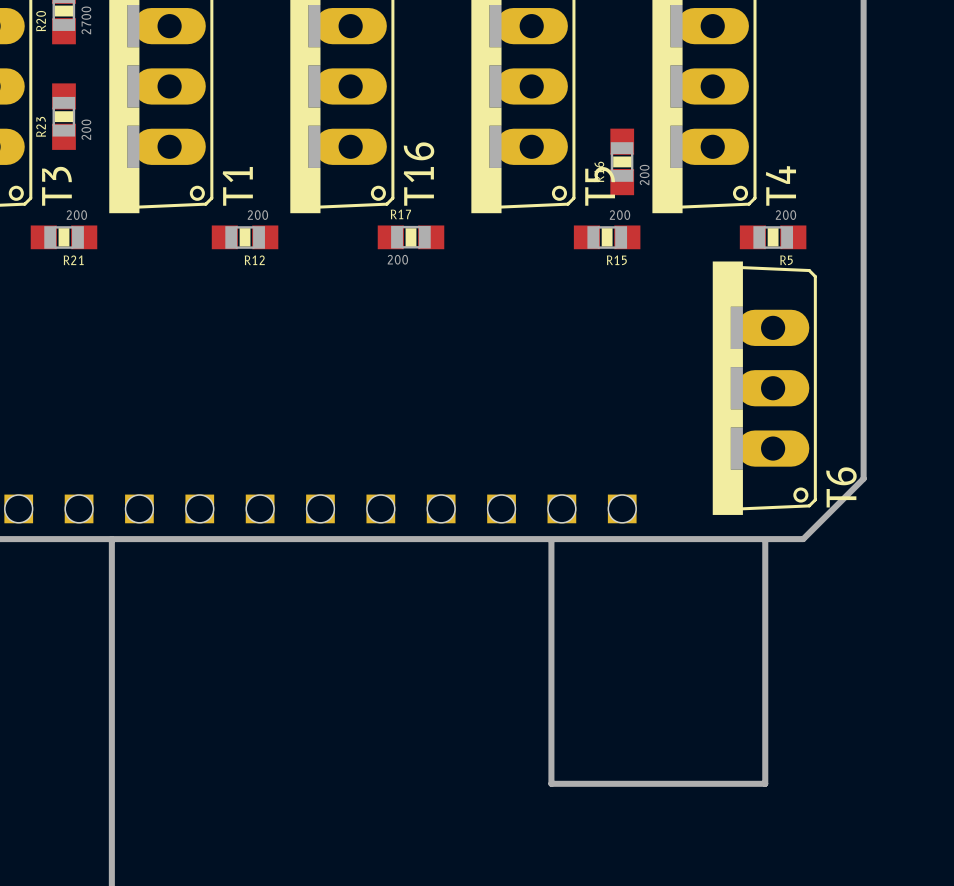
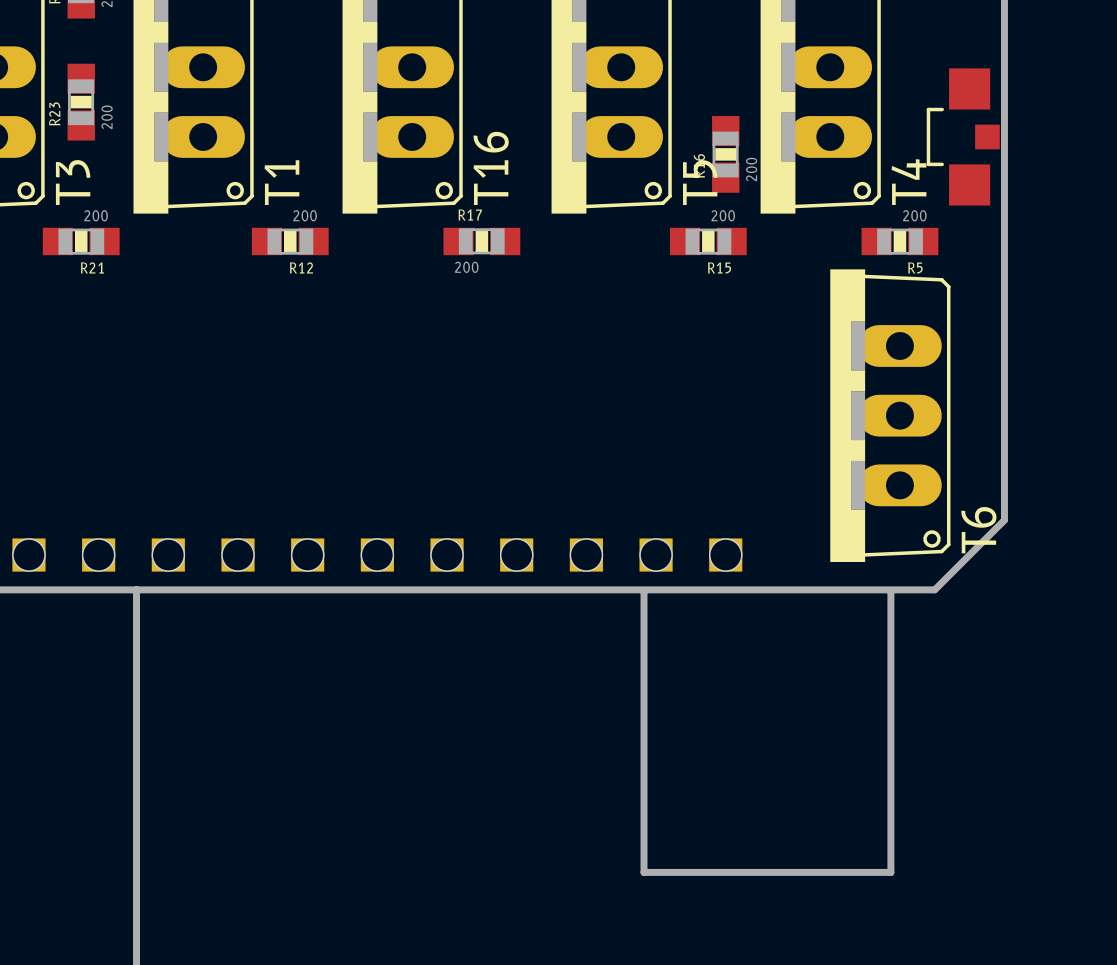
part: none -> (963, 136)

